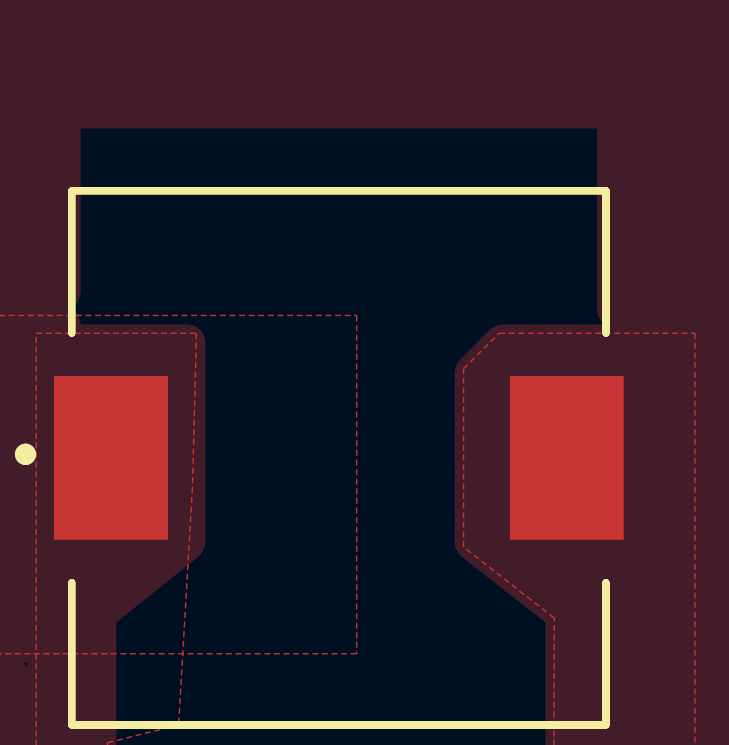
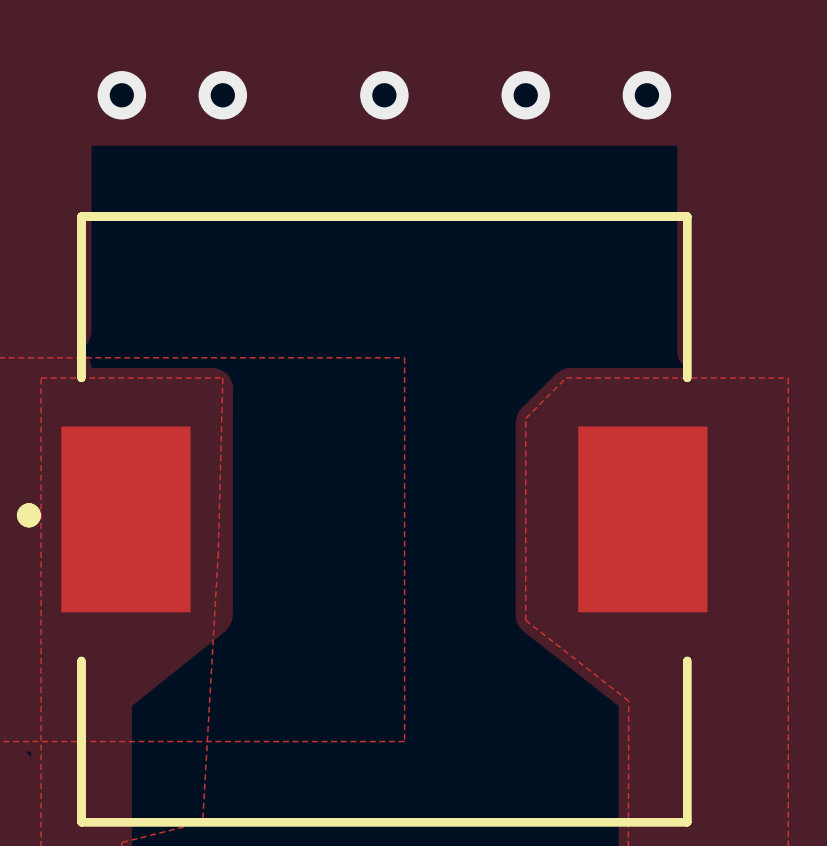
via: none -> (121, 95)
via: none -> (222, 95)
via: none -> (384, 95)
via: none -> (525, 95)
via: none -> (646, 95)

